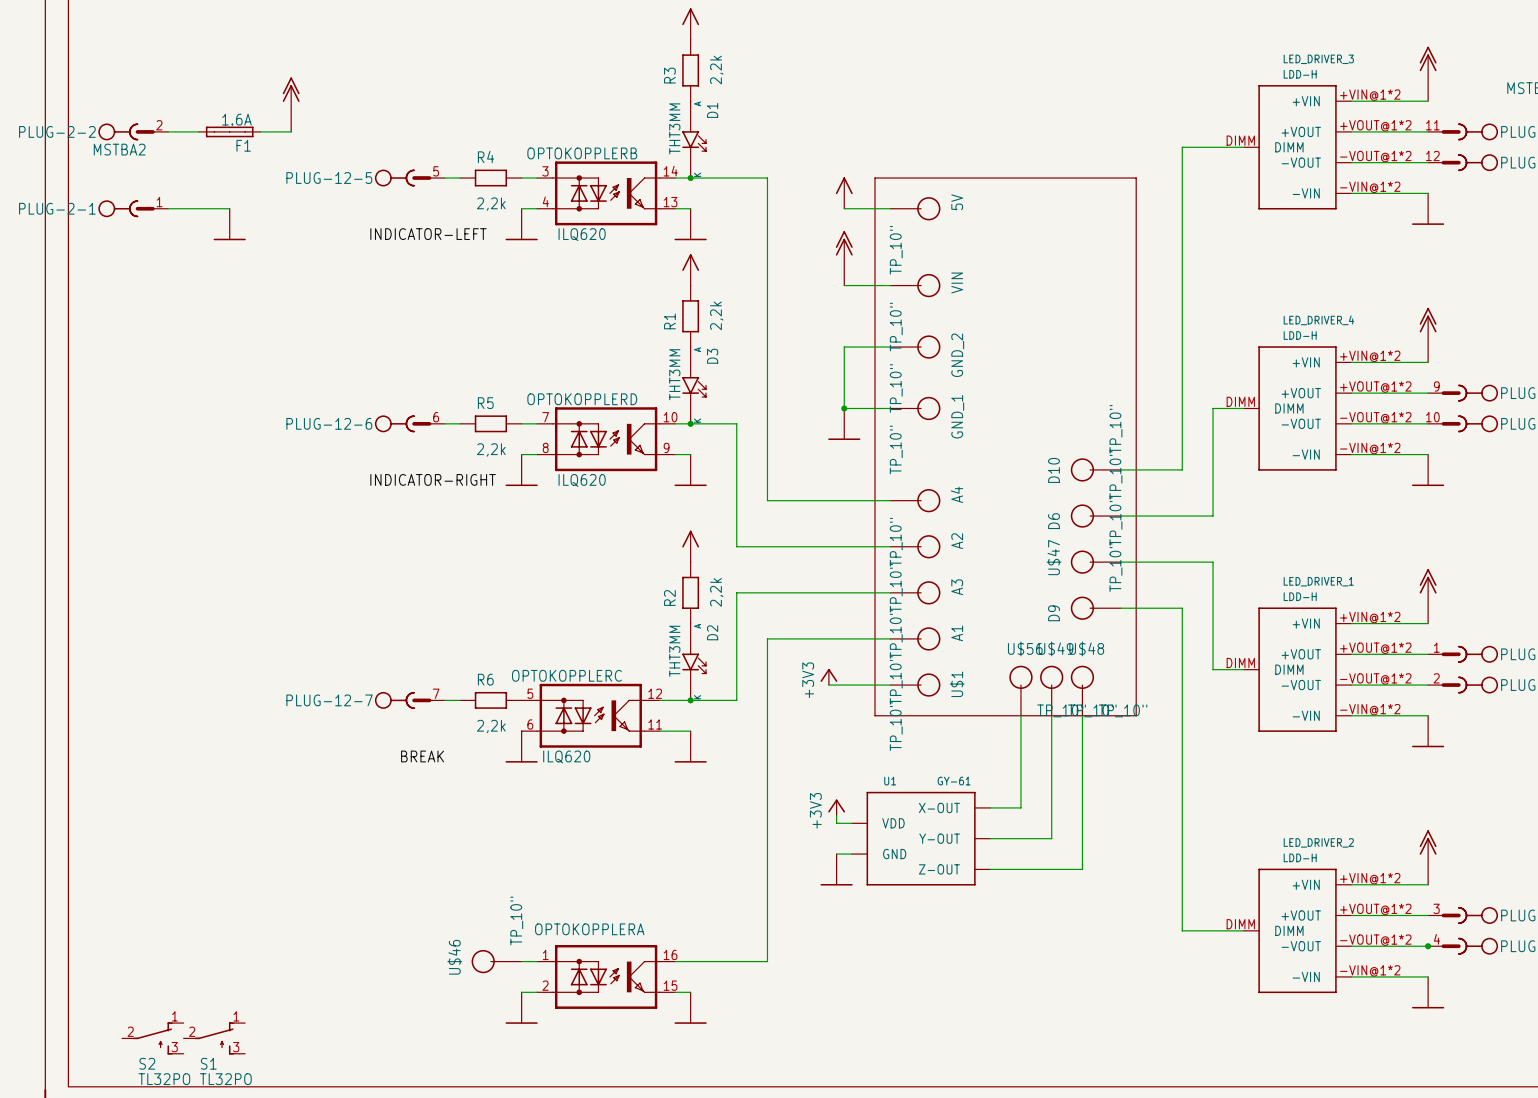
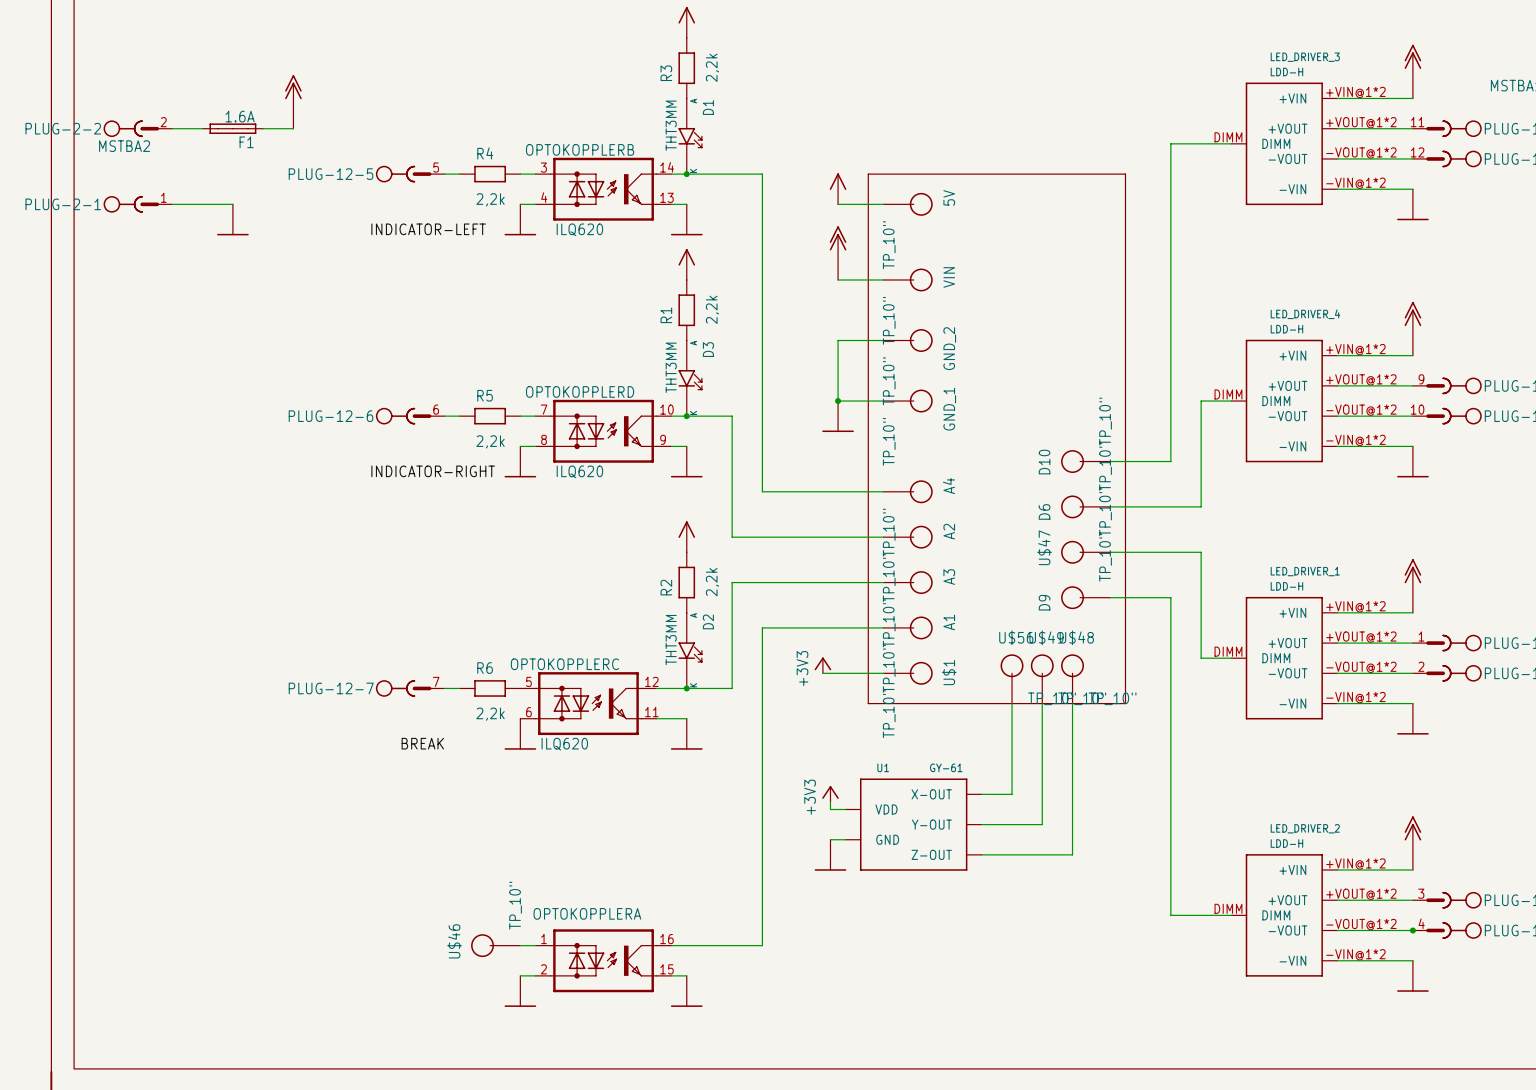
S2: TL32PO (152, 1038) -> none
S1: TL32PO (214, 1038) -> none

